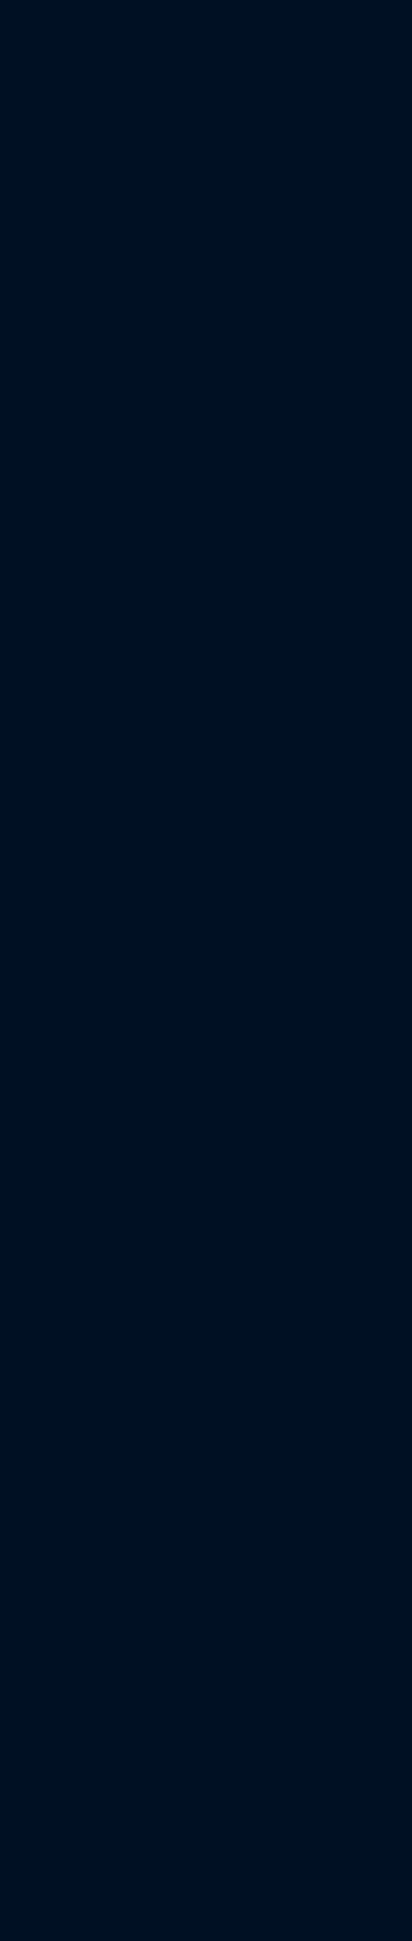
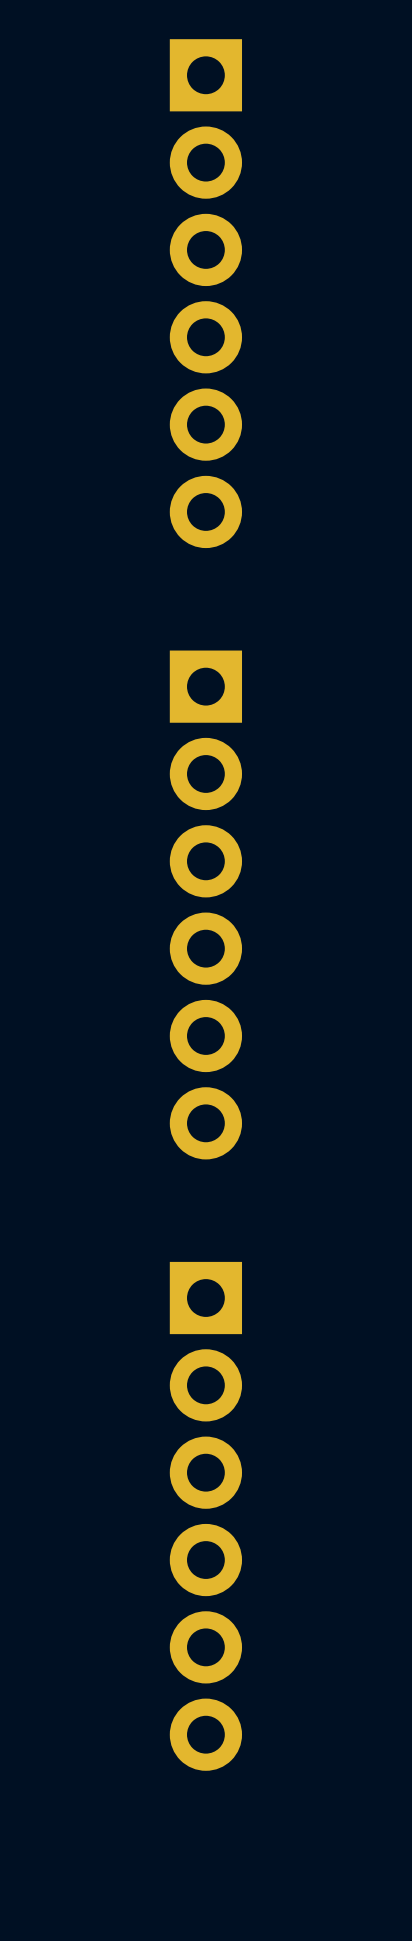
part: none -> (205, 293)
part: none -> (205, 904)
part: none -> (205, 1516)

